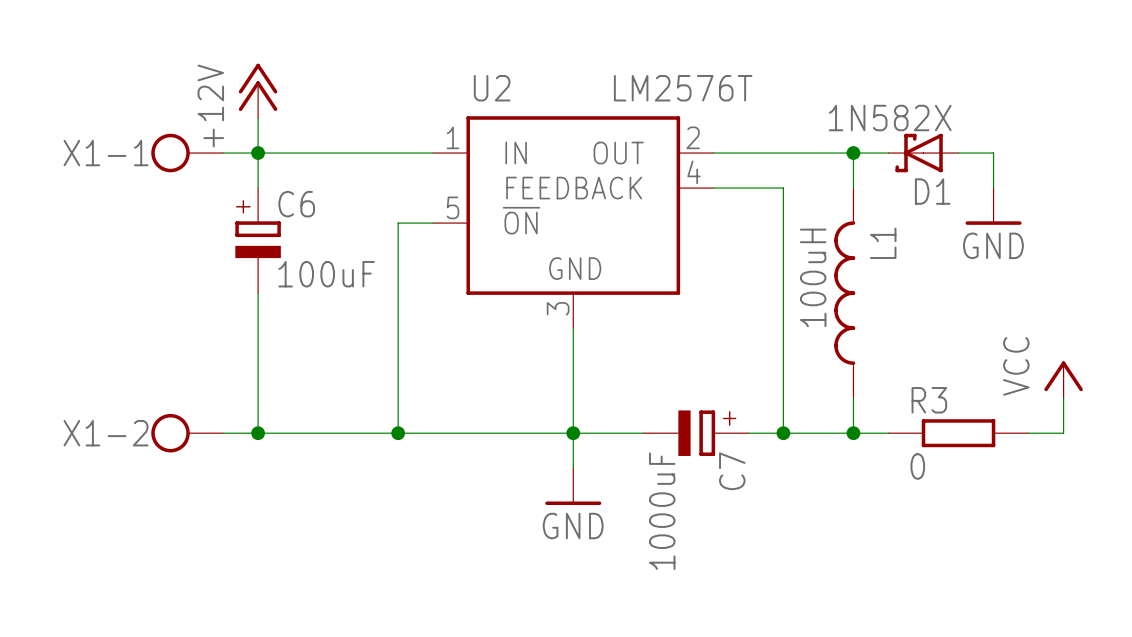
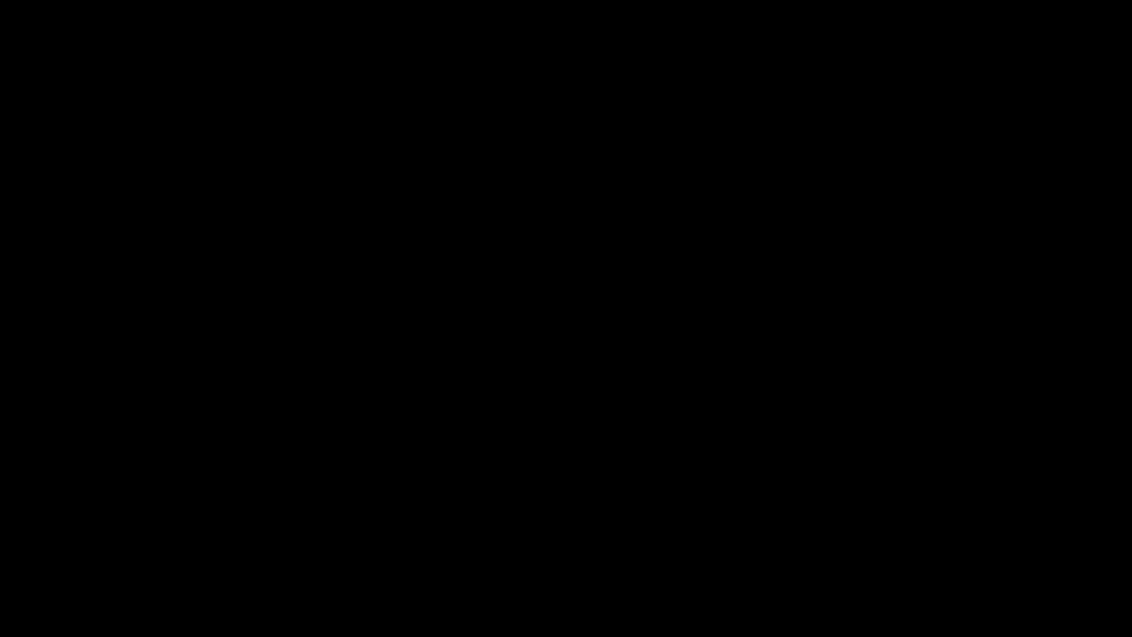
power symbol: +12V (258, 90) -> none
wire: (258, 118) (258, 188) -> none
X1-1: (187, 153) -> none
wire: (223, 153) (433, 153) -> none
junction: (258, 153) -> none
wire: (713, 153) (888, 153) -> none
wire: (853, 153) (853, 188) -> none
junction: (853, 153) -> none
D1: 1N582X (923, 153) -> none
wire: (958, 153) (993, 153) (993, 188) -> none
wire: (713, 188) (783, 188) (783, 433) -> none
power symbol: GND (993, 206) -> none
U2: LM2576T (573, 222) -> none
wire: (433, 223) (398, 223) (398, 433) -> none
C6: 100uF (258, 240) -> none
wire: (258, 293) (258, 433) -> none
L1: 100uH (844, 293) -> none
wire: (573, 328) (573, 468) -> none
power symbol: VCC (1063, 379) -> none
wire: (853, 398) (853, 433) -> none
wire: (1063, 398) (1063, 433) (1028, 433) -> none
X1-2: (187, 433) -> none
wire: (223, 433) (643, 433) -> none
junction: (258, 433) -> none
junction: (398, 433) -> none
junction: (573, 433) -> none
C7: 1000uF (695, 433) -> none
wire: (748, 433) (888, 433) -> none
junction: (783, 433) -> none
junction: (853, 433) -> none
R3: 0 (958, 433) -> none
power symbol: GND (573, 486) -> none

